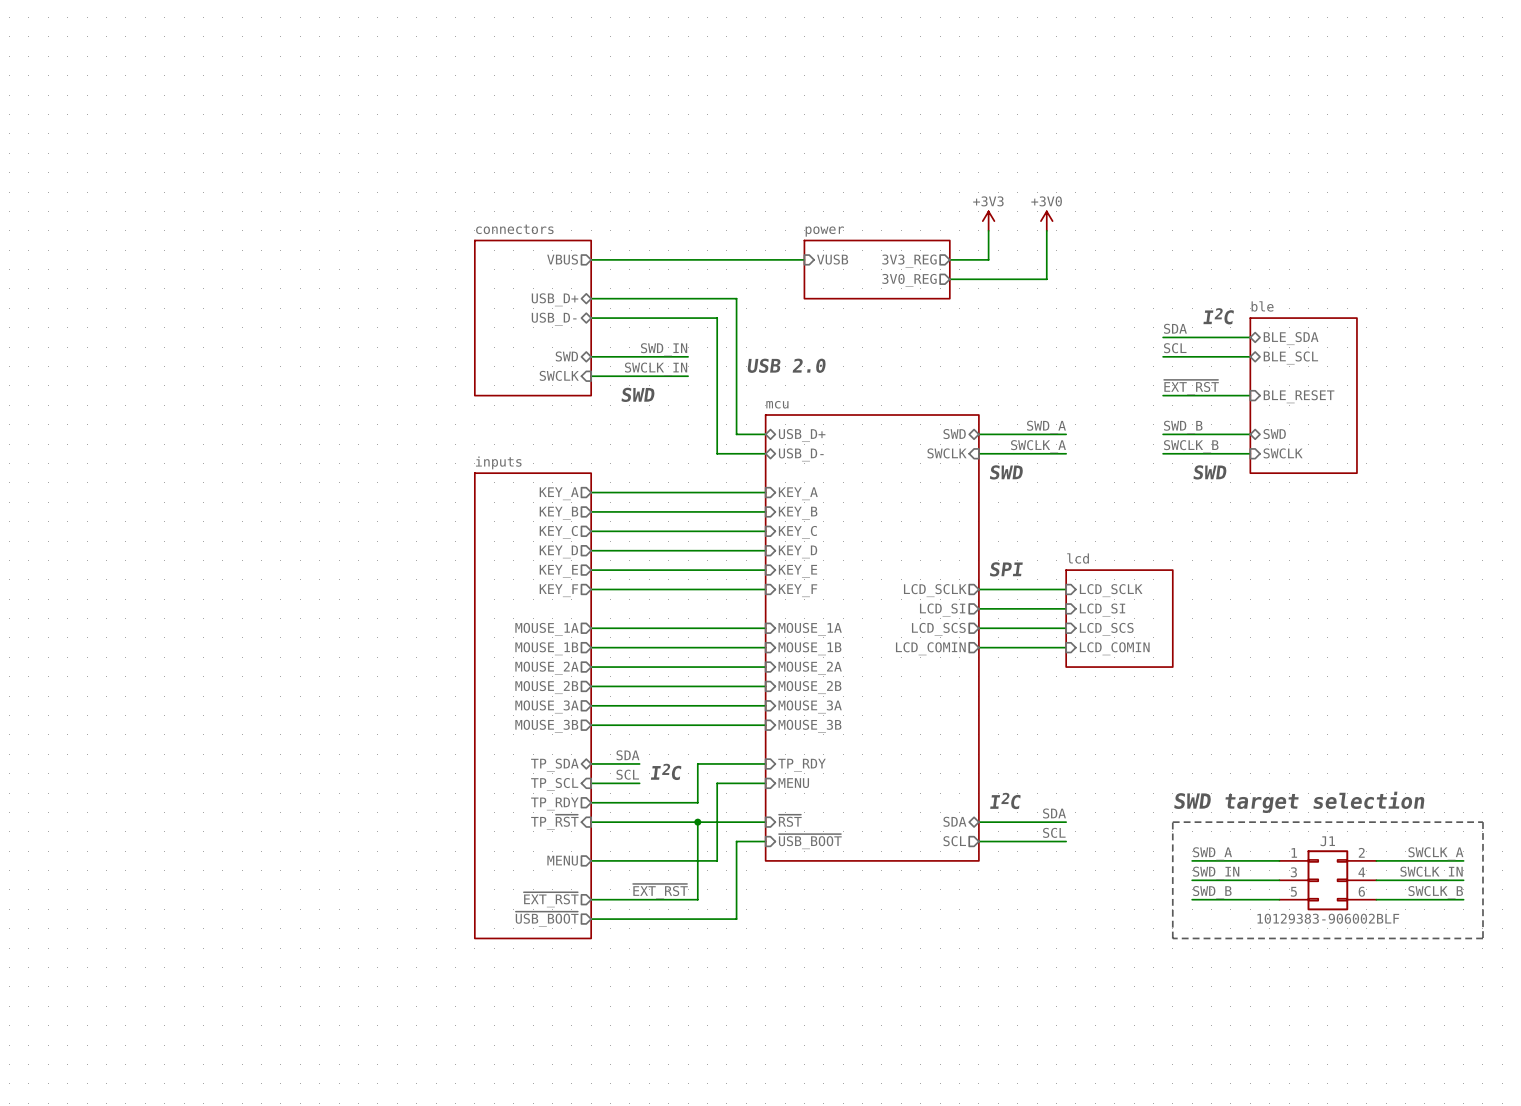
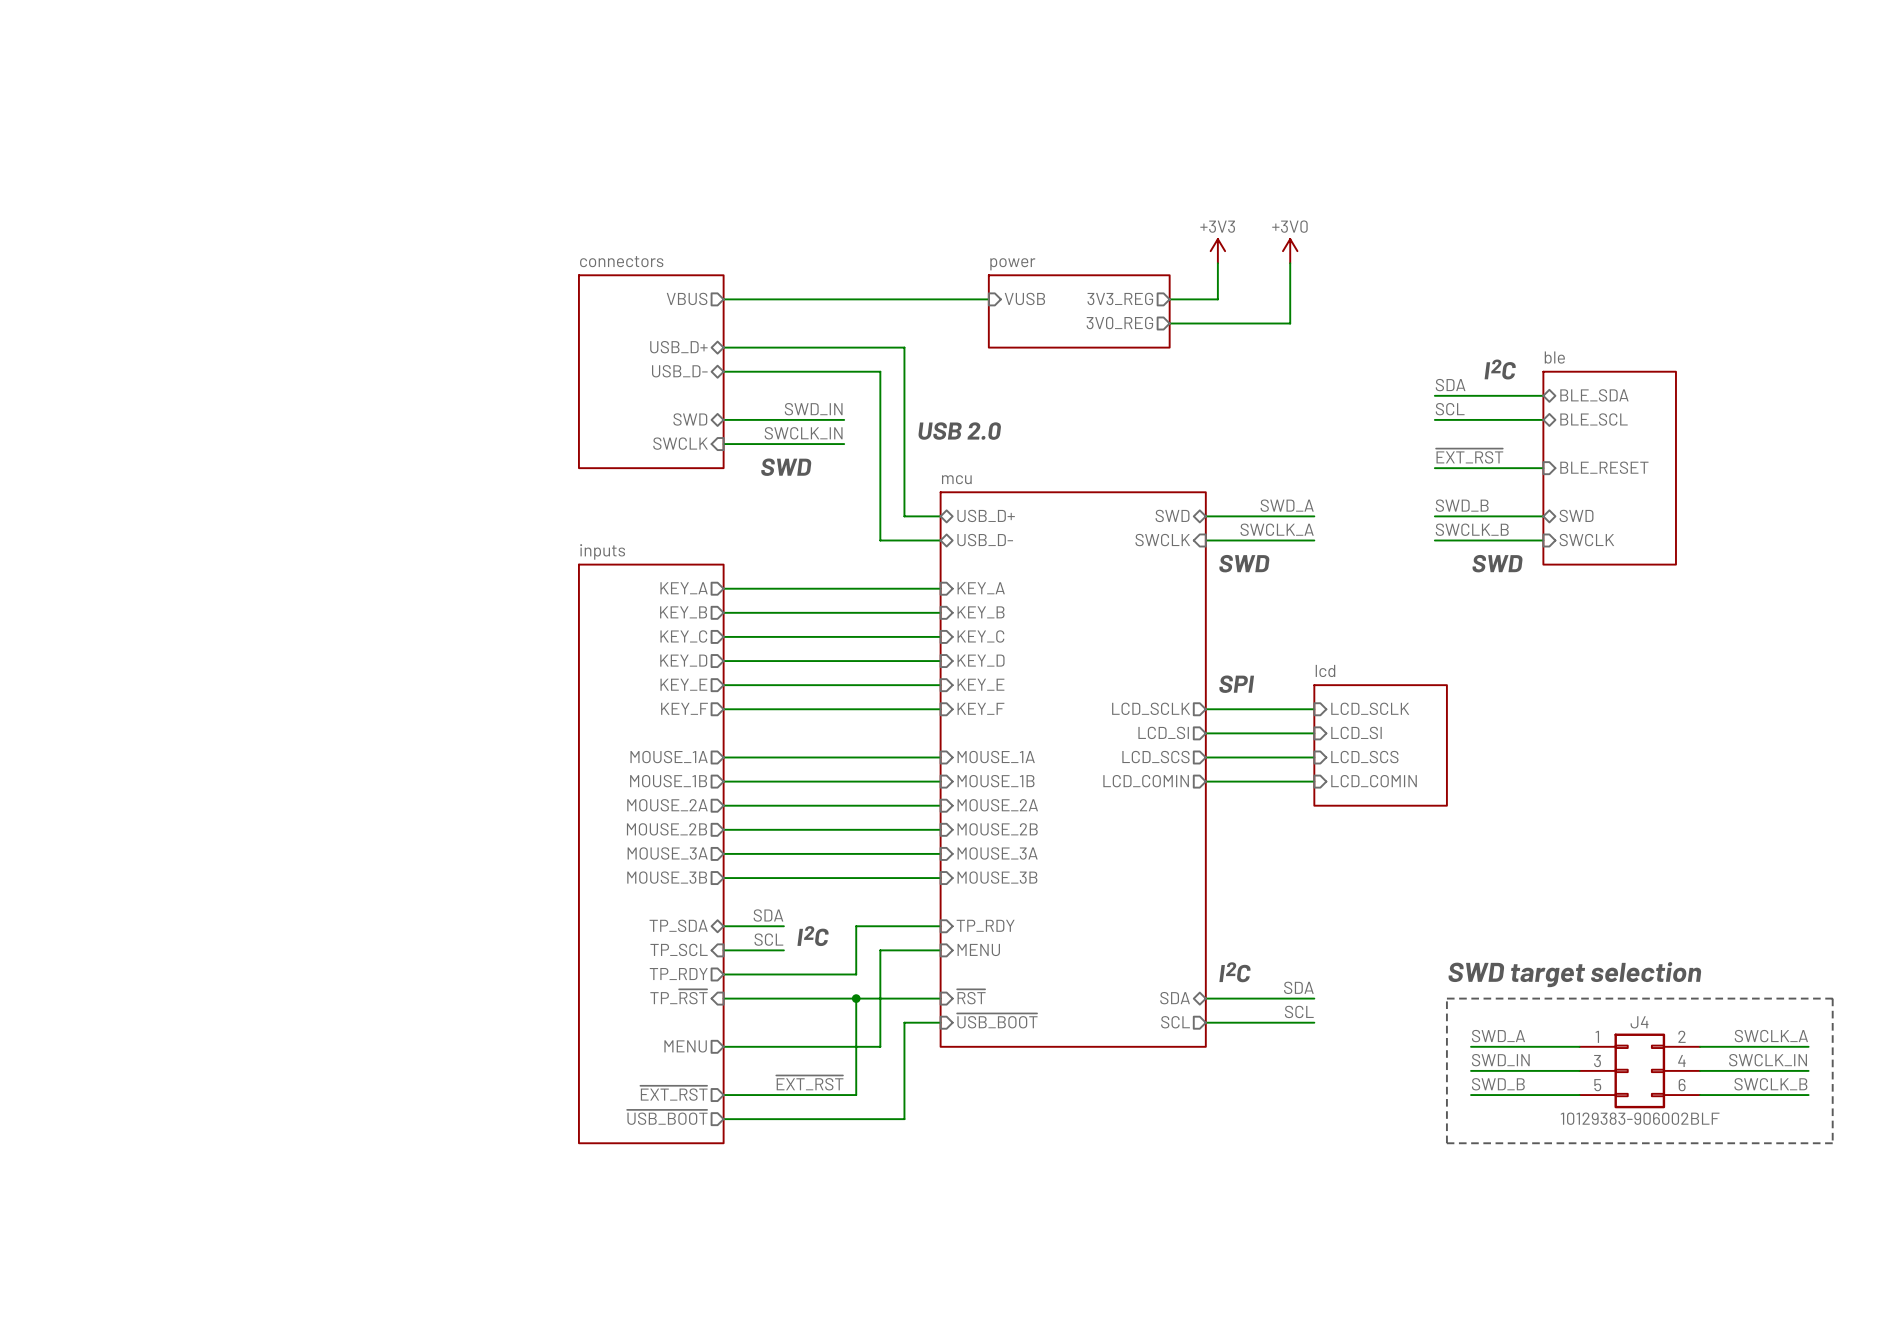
J1 name: J1 (1327, 841) -> J4 (1639, 1022)

